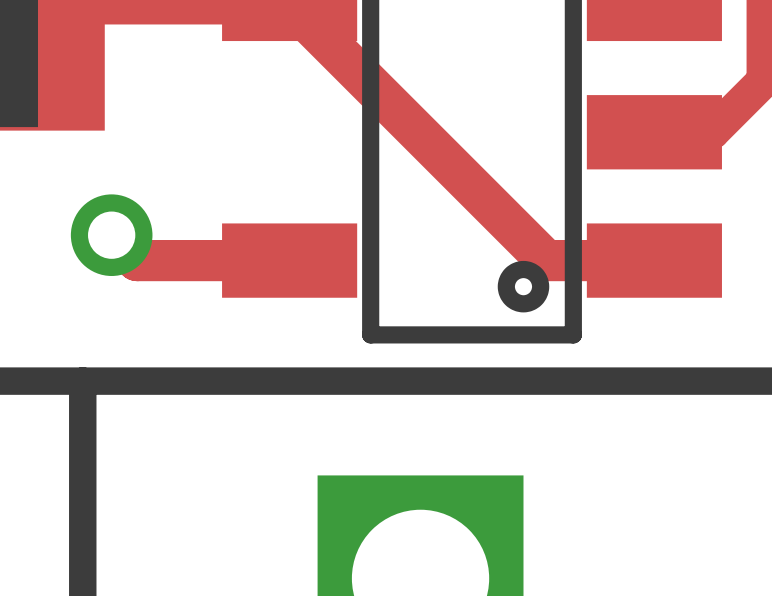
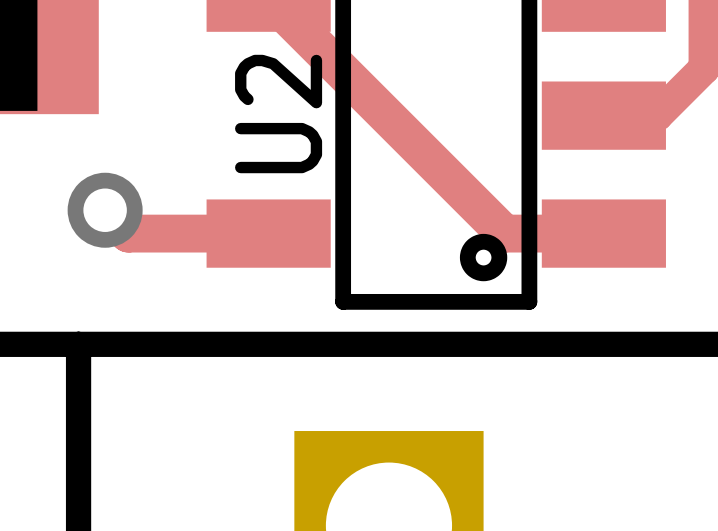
U2 name: none -> U2 (278, 114)

